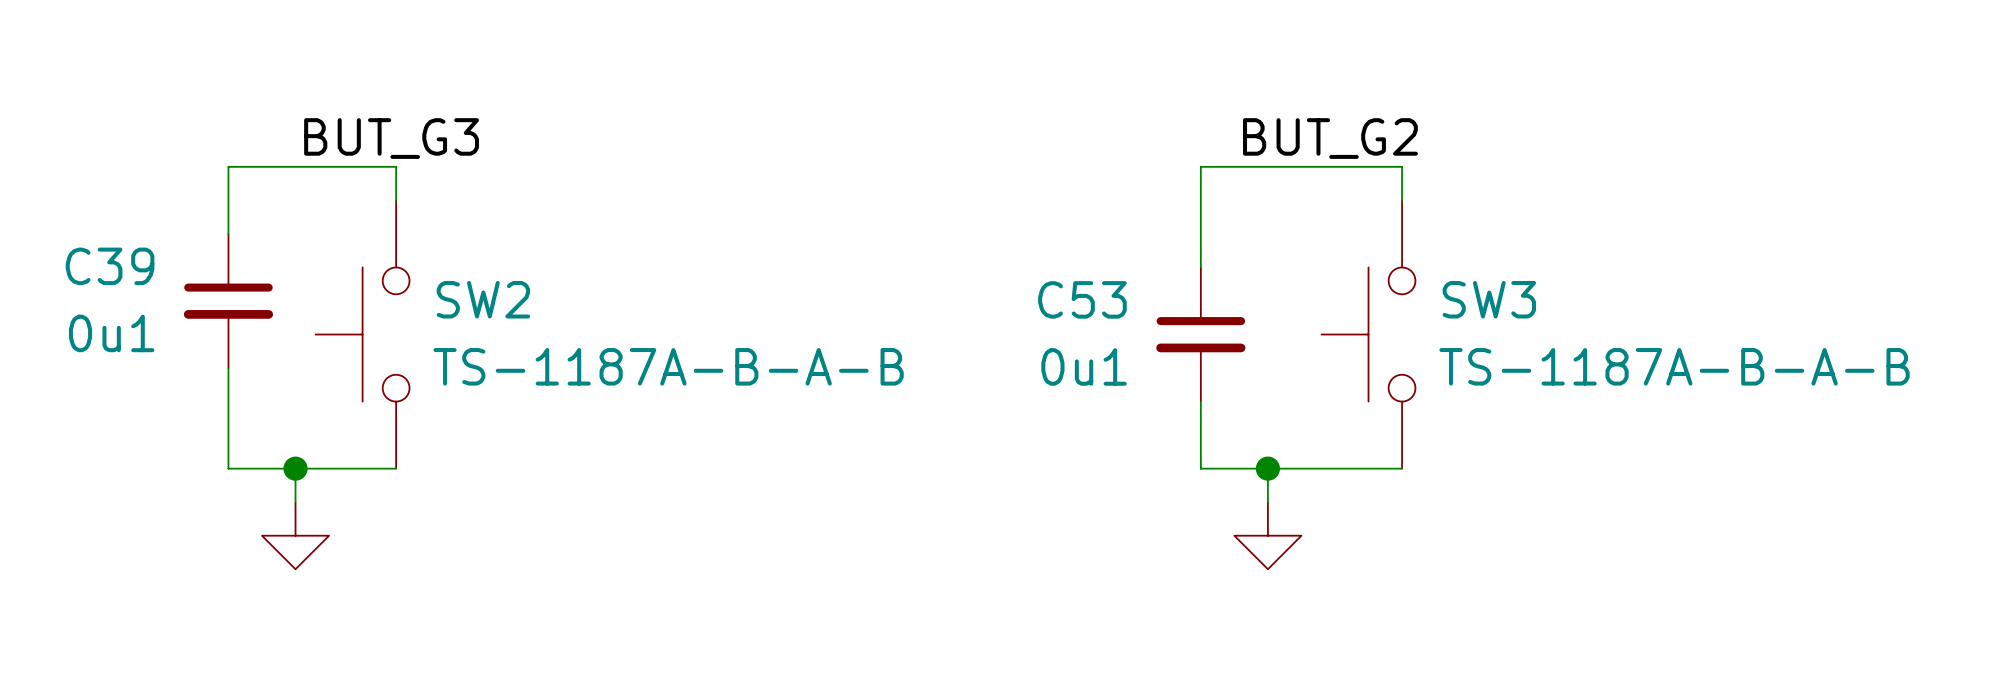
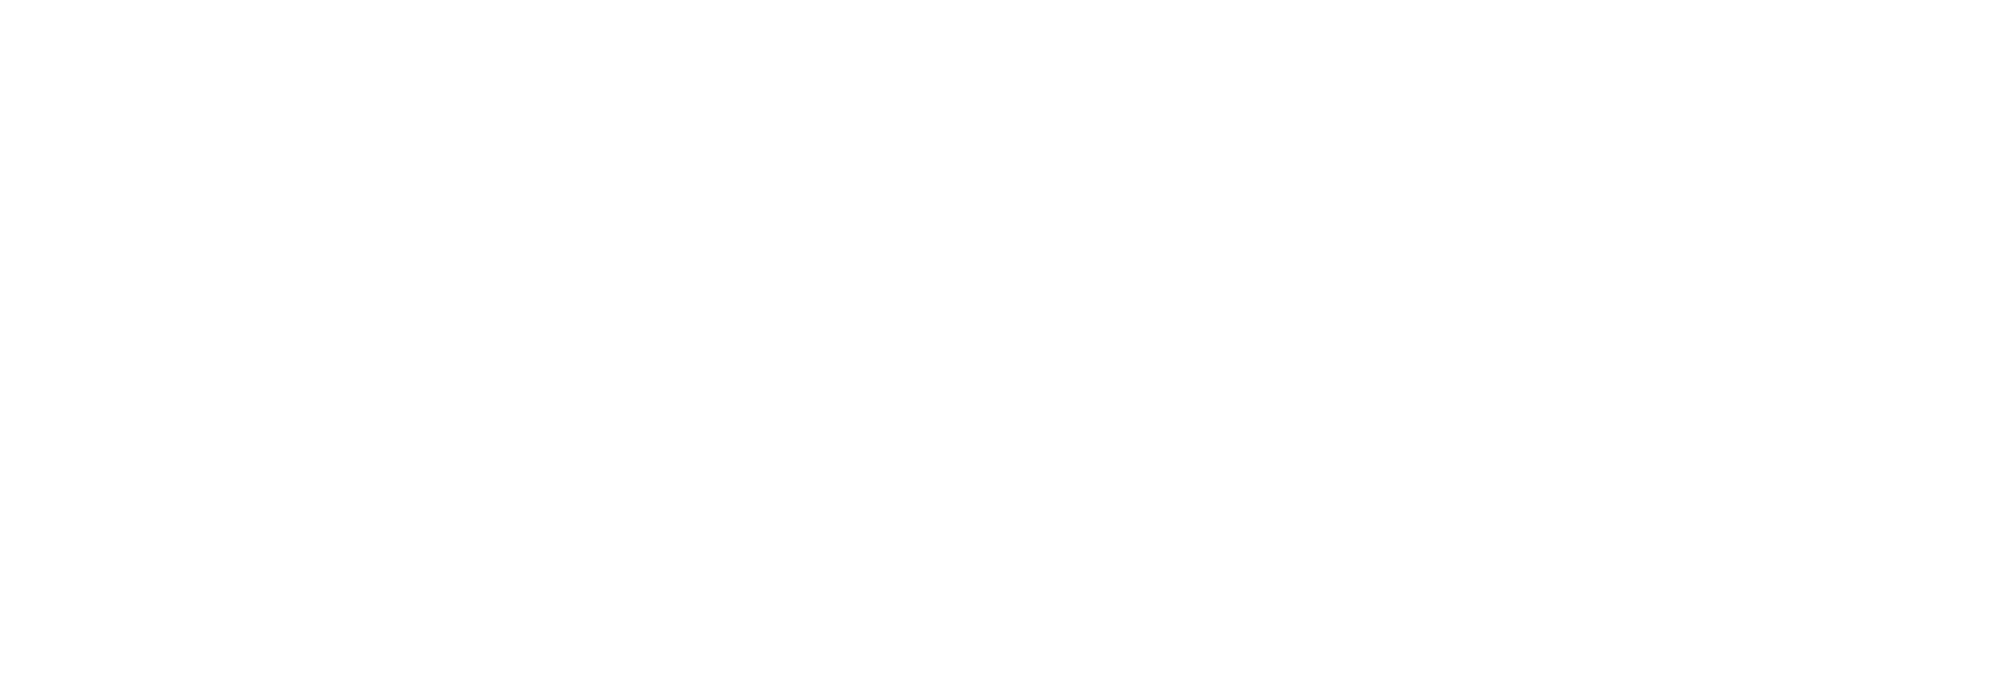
label: BUT_G3 (391, 138) -> none
label: BUT_G2 (1330, 138) -> none
wire: (396, 200) (396, 166) (228, 166) (228, 233) -> none
wire: (1402, 200) (1402, 166) (1200, 166) (1200, 267) -> none
C39: 0u1 (228, 300) -> none
SW2: TS-1187A-B-A-B (362, 334) -> none
C53: 0u1 (1200, 334) -> none
SW3: TS-1187A-B-A-B (1368, 334) -> none
wire: (228, 368) (228, 468) (396, 468) -> none
wire: (1200, 401) (1200, 468) (1402, 468) -> none
wire: (295, 468) (295, 502) -> none
junction: (295, 468) -> none
wire: (1267, 468) (1267, 502) -> none
junction: (1267, 468) -> none
power symbol: (295, 535) -> none
power symbol: (1267, 535) -> none

